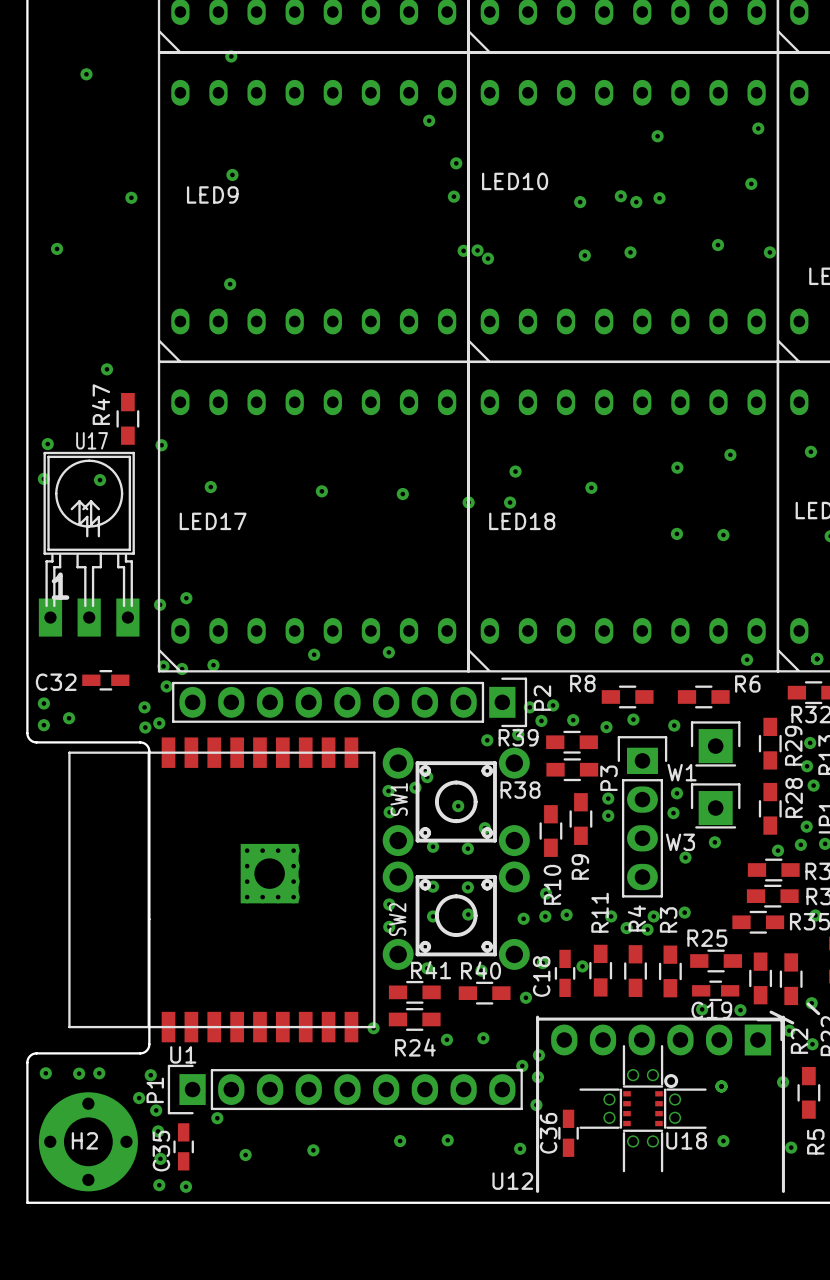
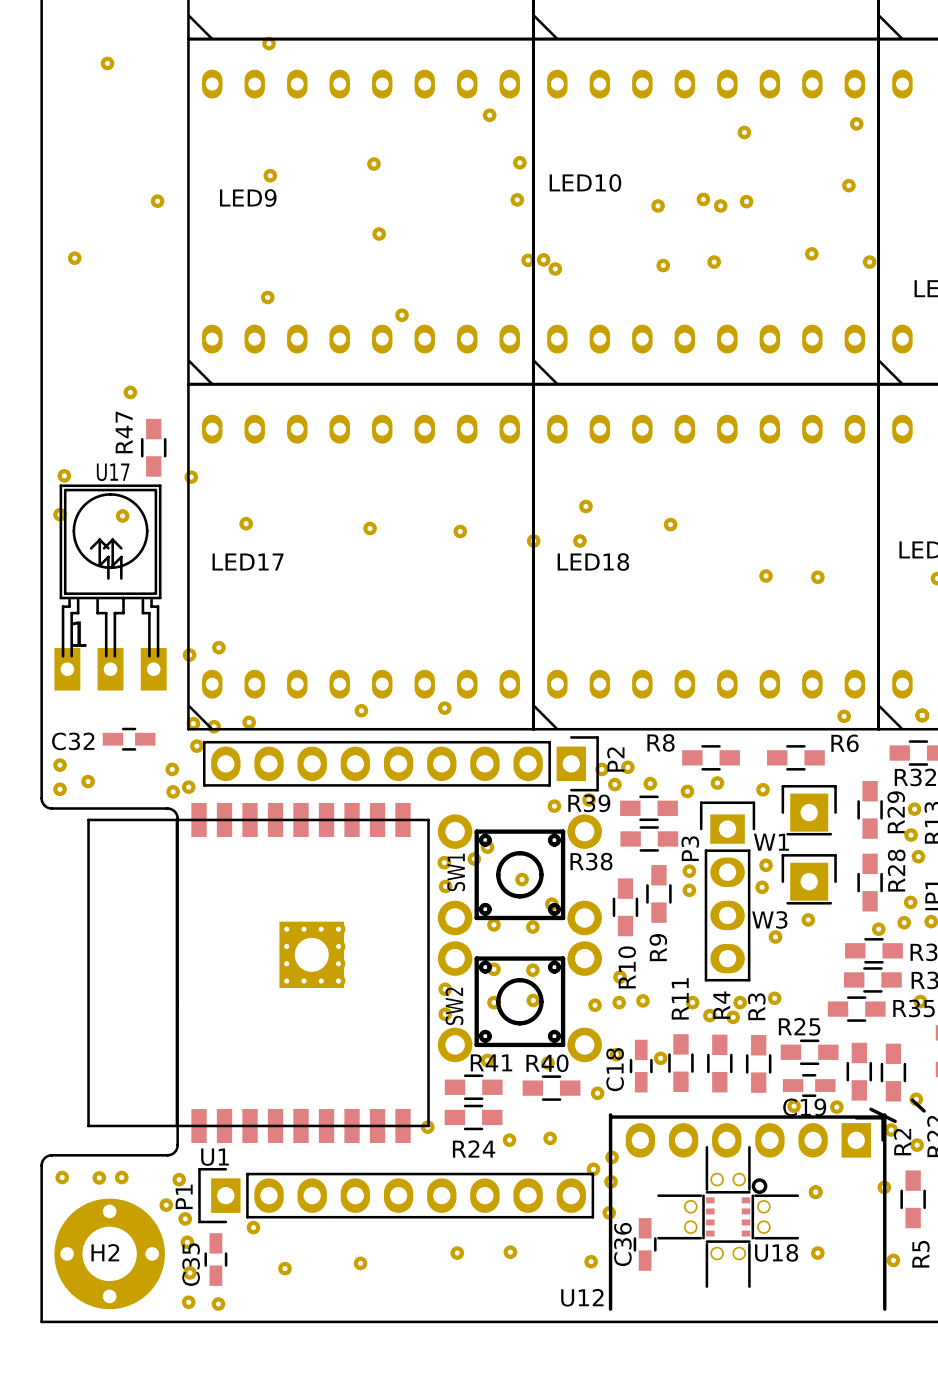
part: none -> (373, 164)
part: none -> (379, 234)
part: none -> (402, 315)
part: (810, 451) -> none
part: (730, 454) -> none
part: (677, 467) -> none

